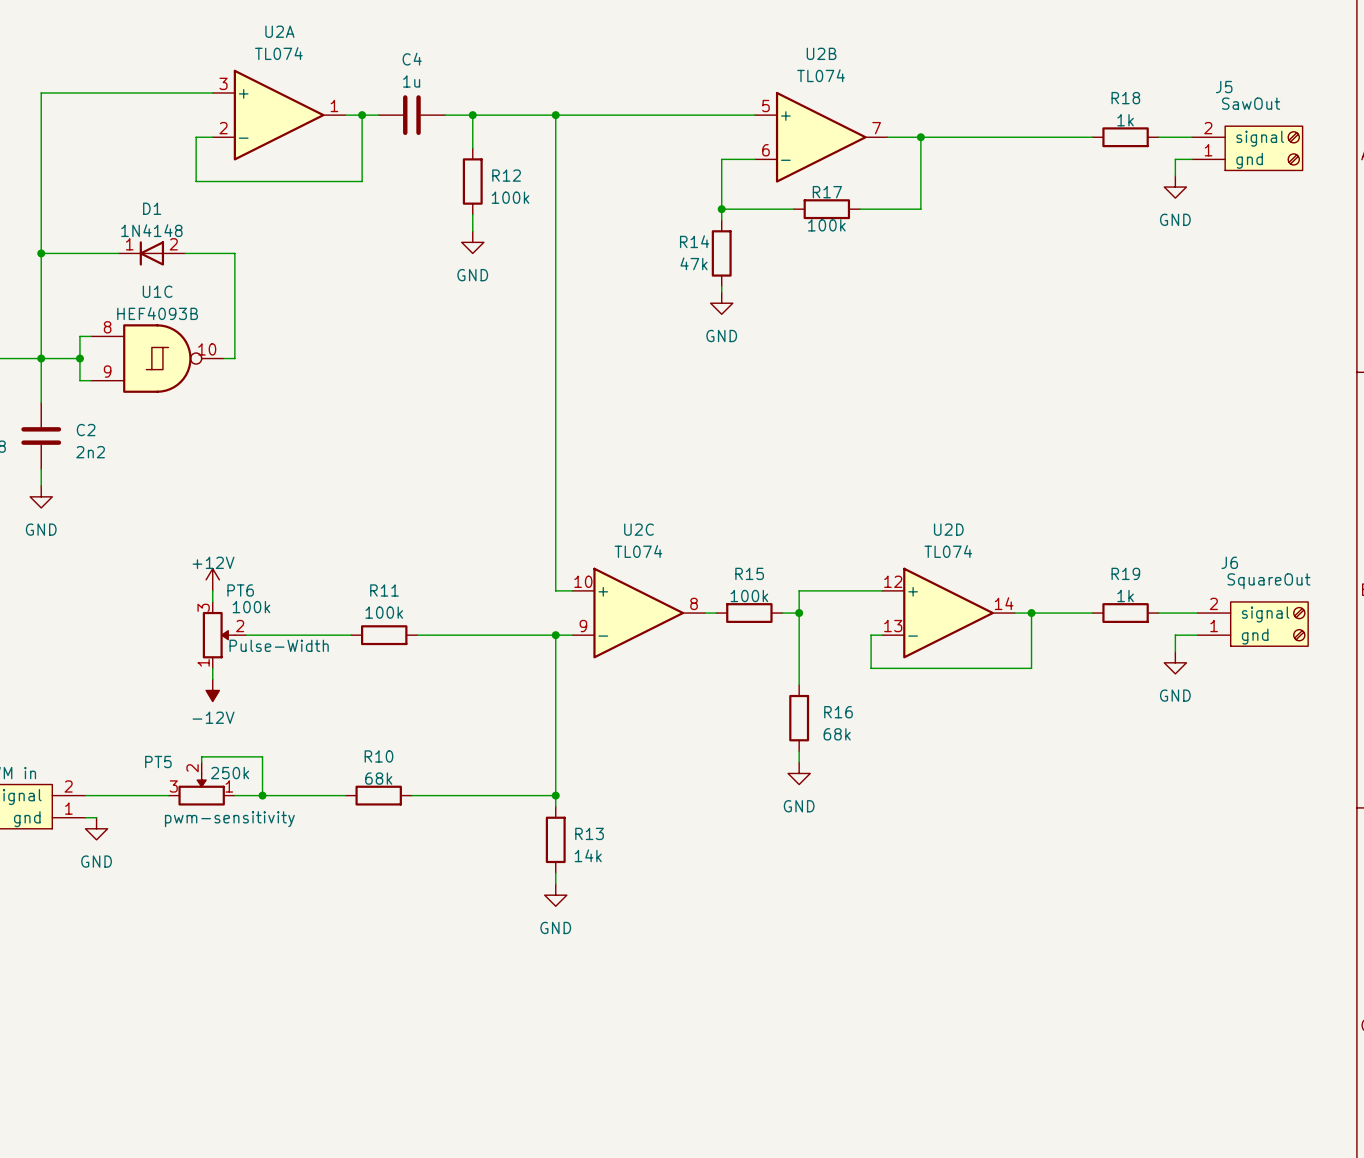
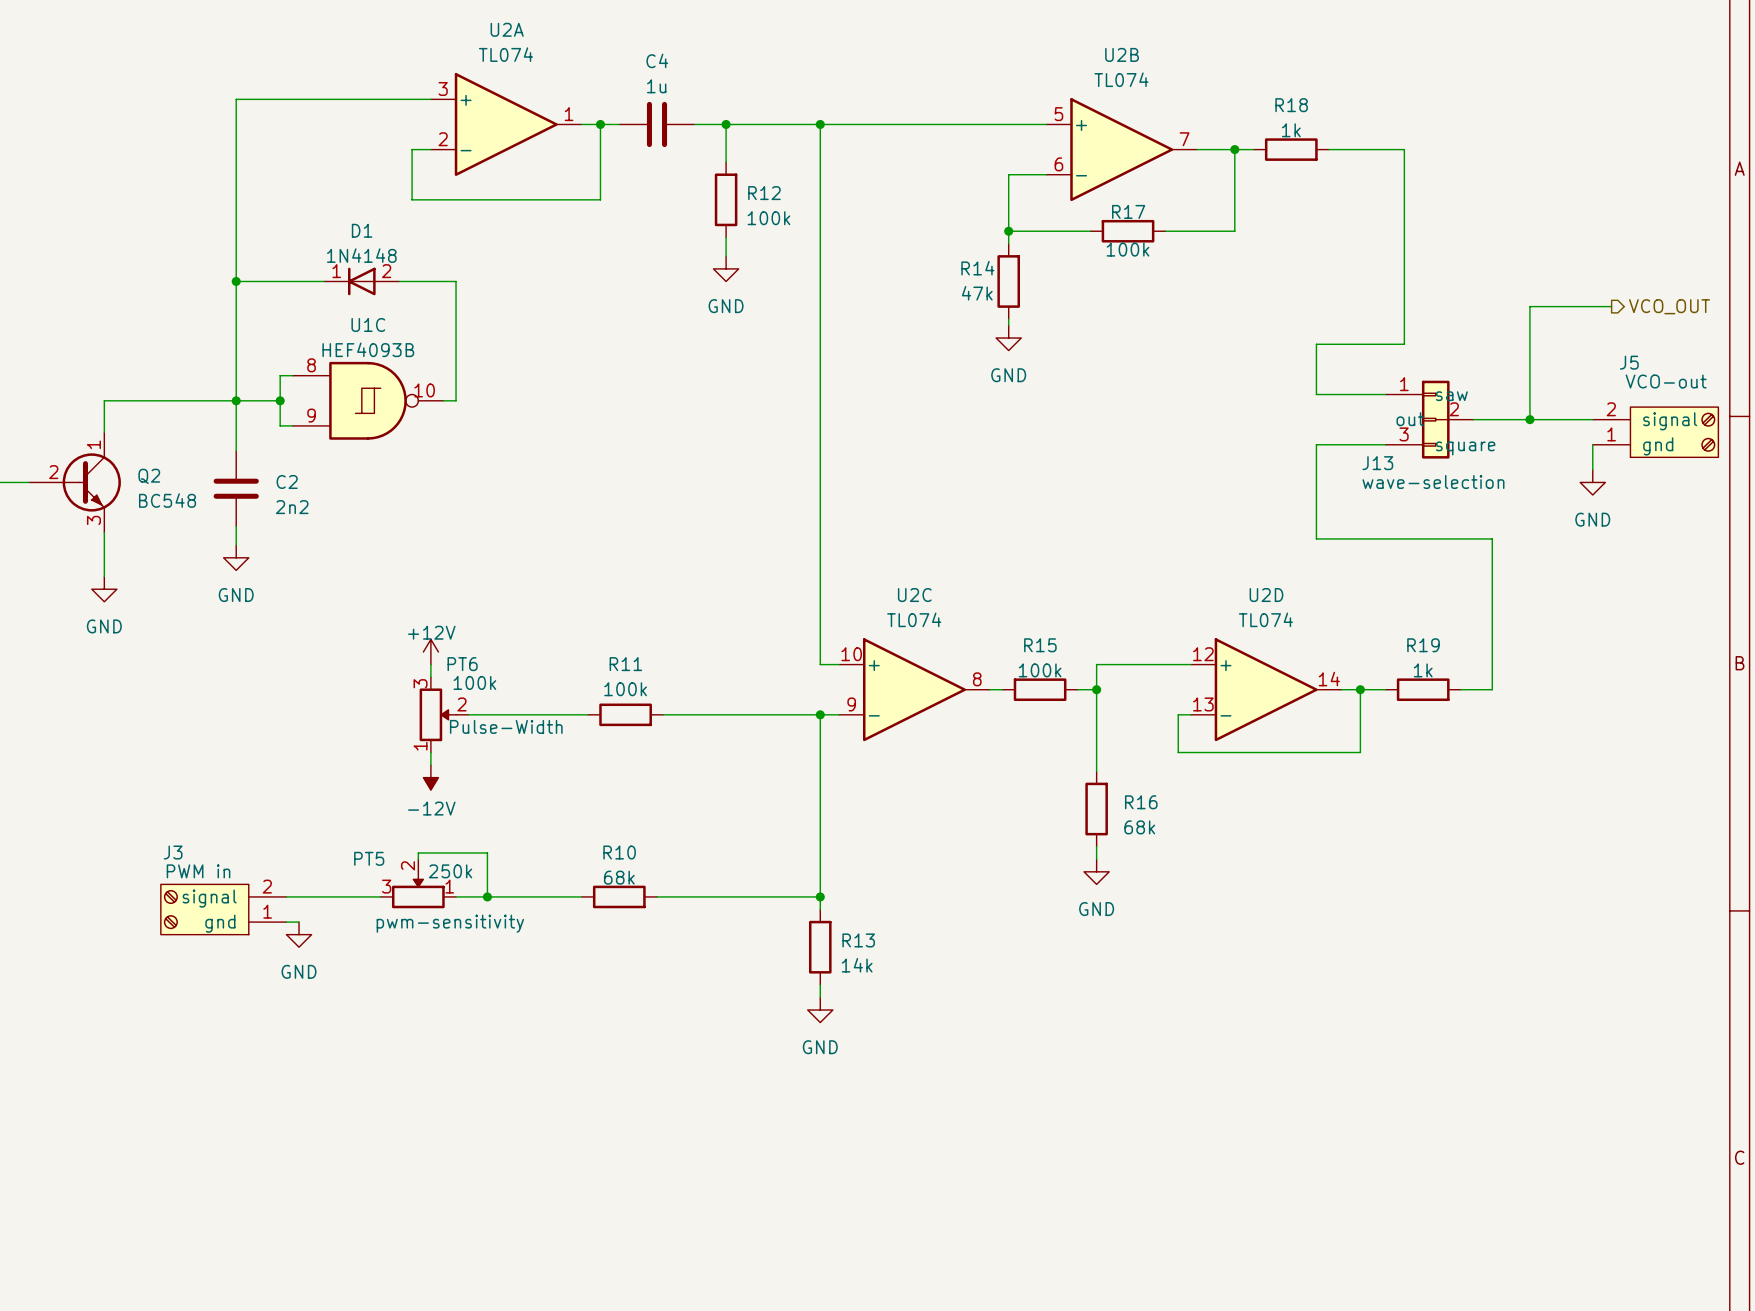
J5 value: SawOut (1251, 103) -> VCO-out (1666, 381)
wire: (937, 137) (1003, 137) -> none
wire: (1070, 137) (1092, 137) -> (1404, 149) (1404, 344) (1316, 344) (1316, 394) (1385, 394)
R18 position: (1125, 137) -> (1291, 149)
wire: (1158, 137) (1191, 137) -> none
J5 position: (1247, 148) -> (1655, 432)
wire: (1191, 159) (1175, 159) (1175, 175) -> none
power symbol: GND (1175, 187) -> none
wire: none -> (1611, 306) (1529, 306) (1529, 419)
hierarchical label: none -> VCO_OUT (1669, 306)
J13: none -> wave-selection (1429, 419)
wire: none -> (1473, 419) (1592, 419)
junction: none -> (1529, 419)
wire: none -> (1385, 444) (1316, 444) (1316, 538) (1492, 538) (1492, 689) (1460, 689)
wire: none -> (1592, 444) (1592, 469)
power symbol: none -> GND (1592, 482)
wire: (1053, 613) (1092, 613) -> none
R19 position: (1125, 613) -> (1423, 689)
wire: (1158, 613) (1197, 613) -> none
J6: SquareOut (1252, 624) -> none
wire: (1197, 635) (1175, 635) (1175, 651) -> none
power symbol: GND (1175, 662) -> none

